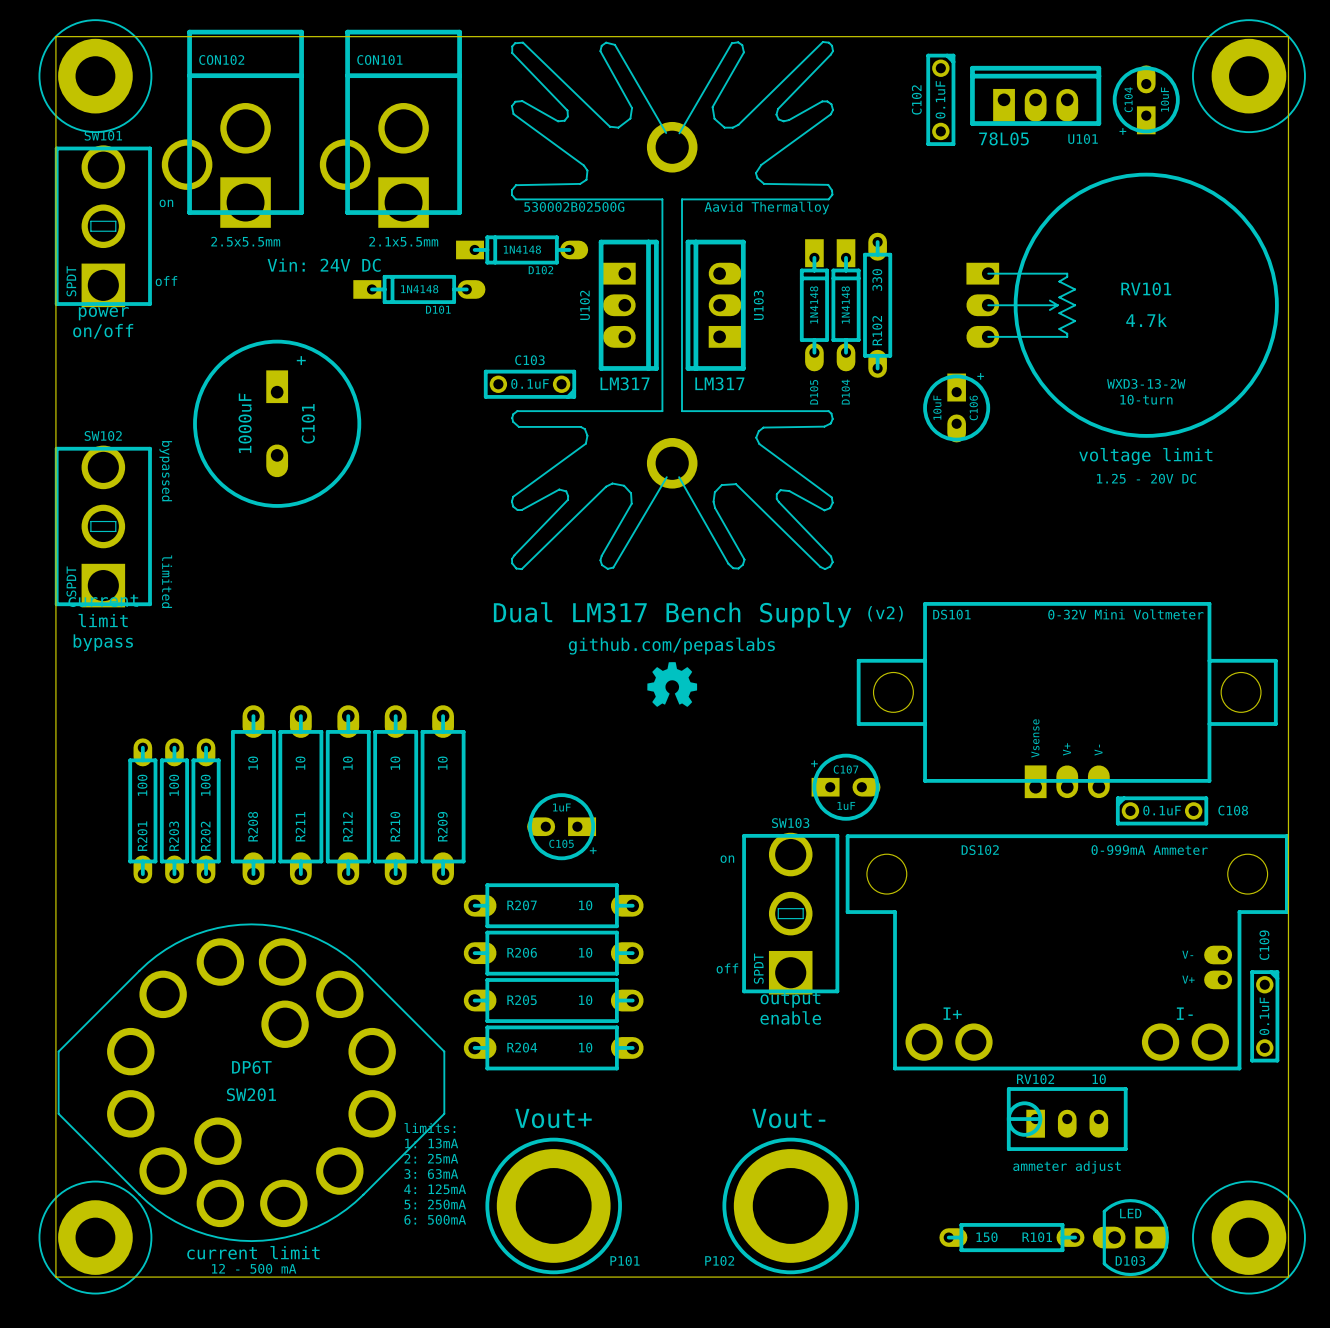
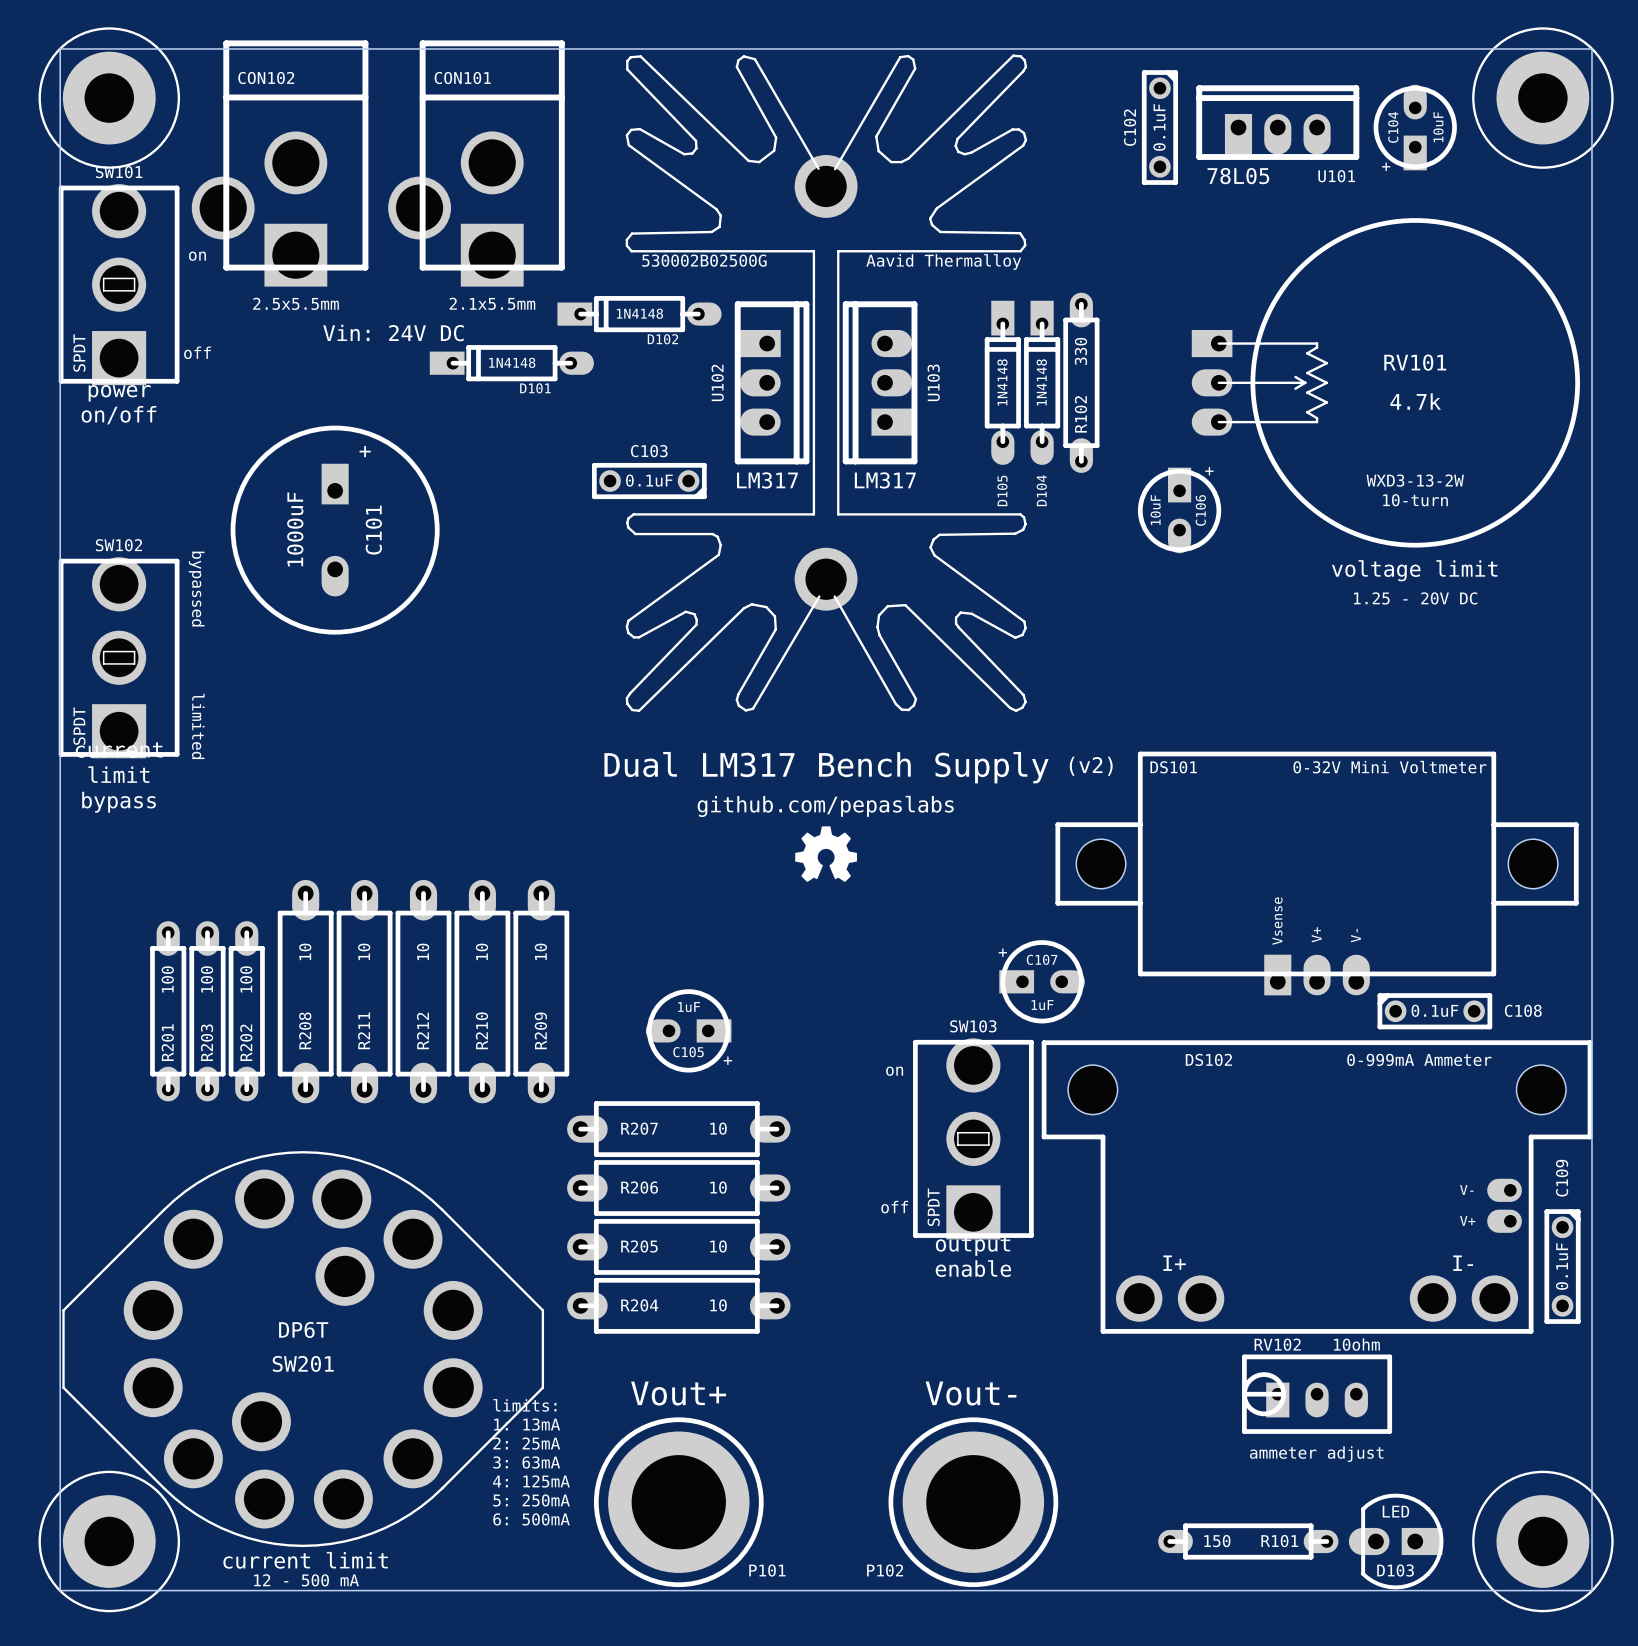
RV102 value: 10 (1099, 1079) -> 10ohm (1356, 1344)

